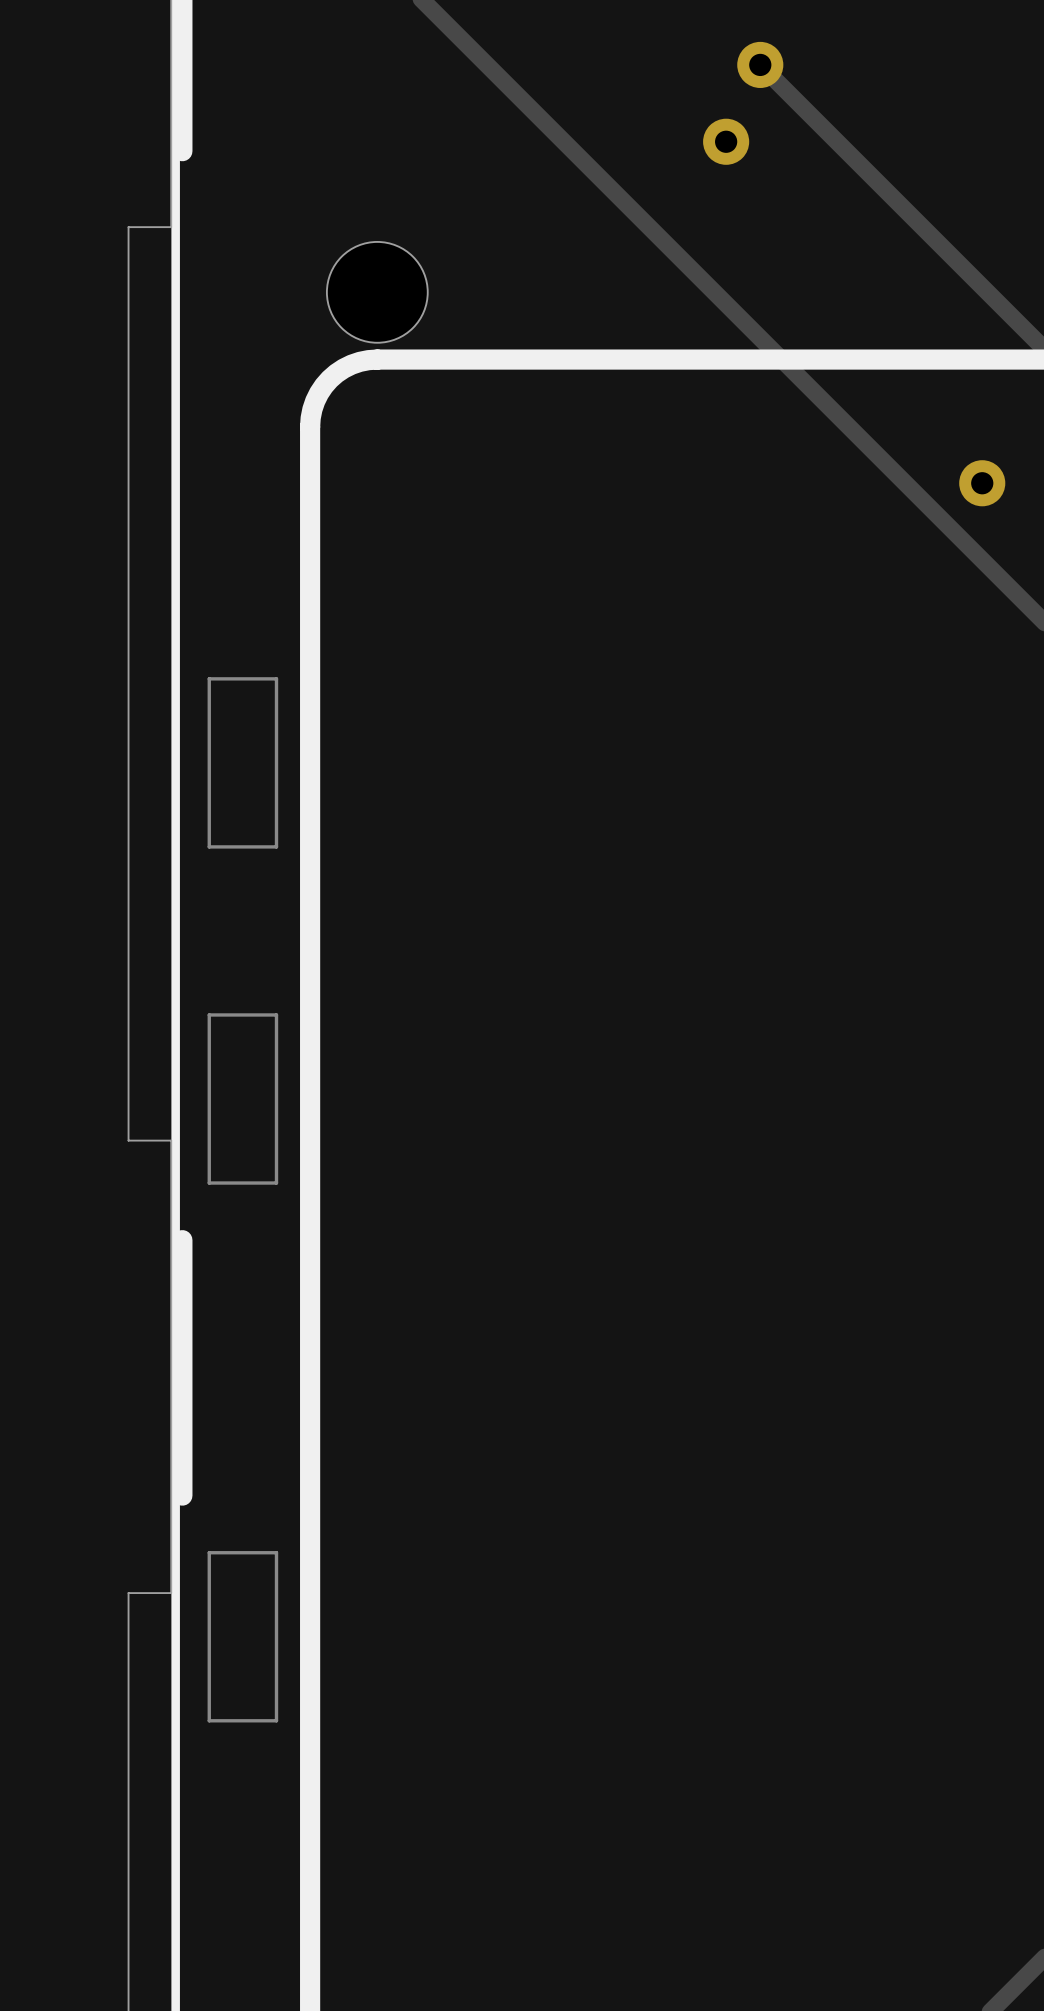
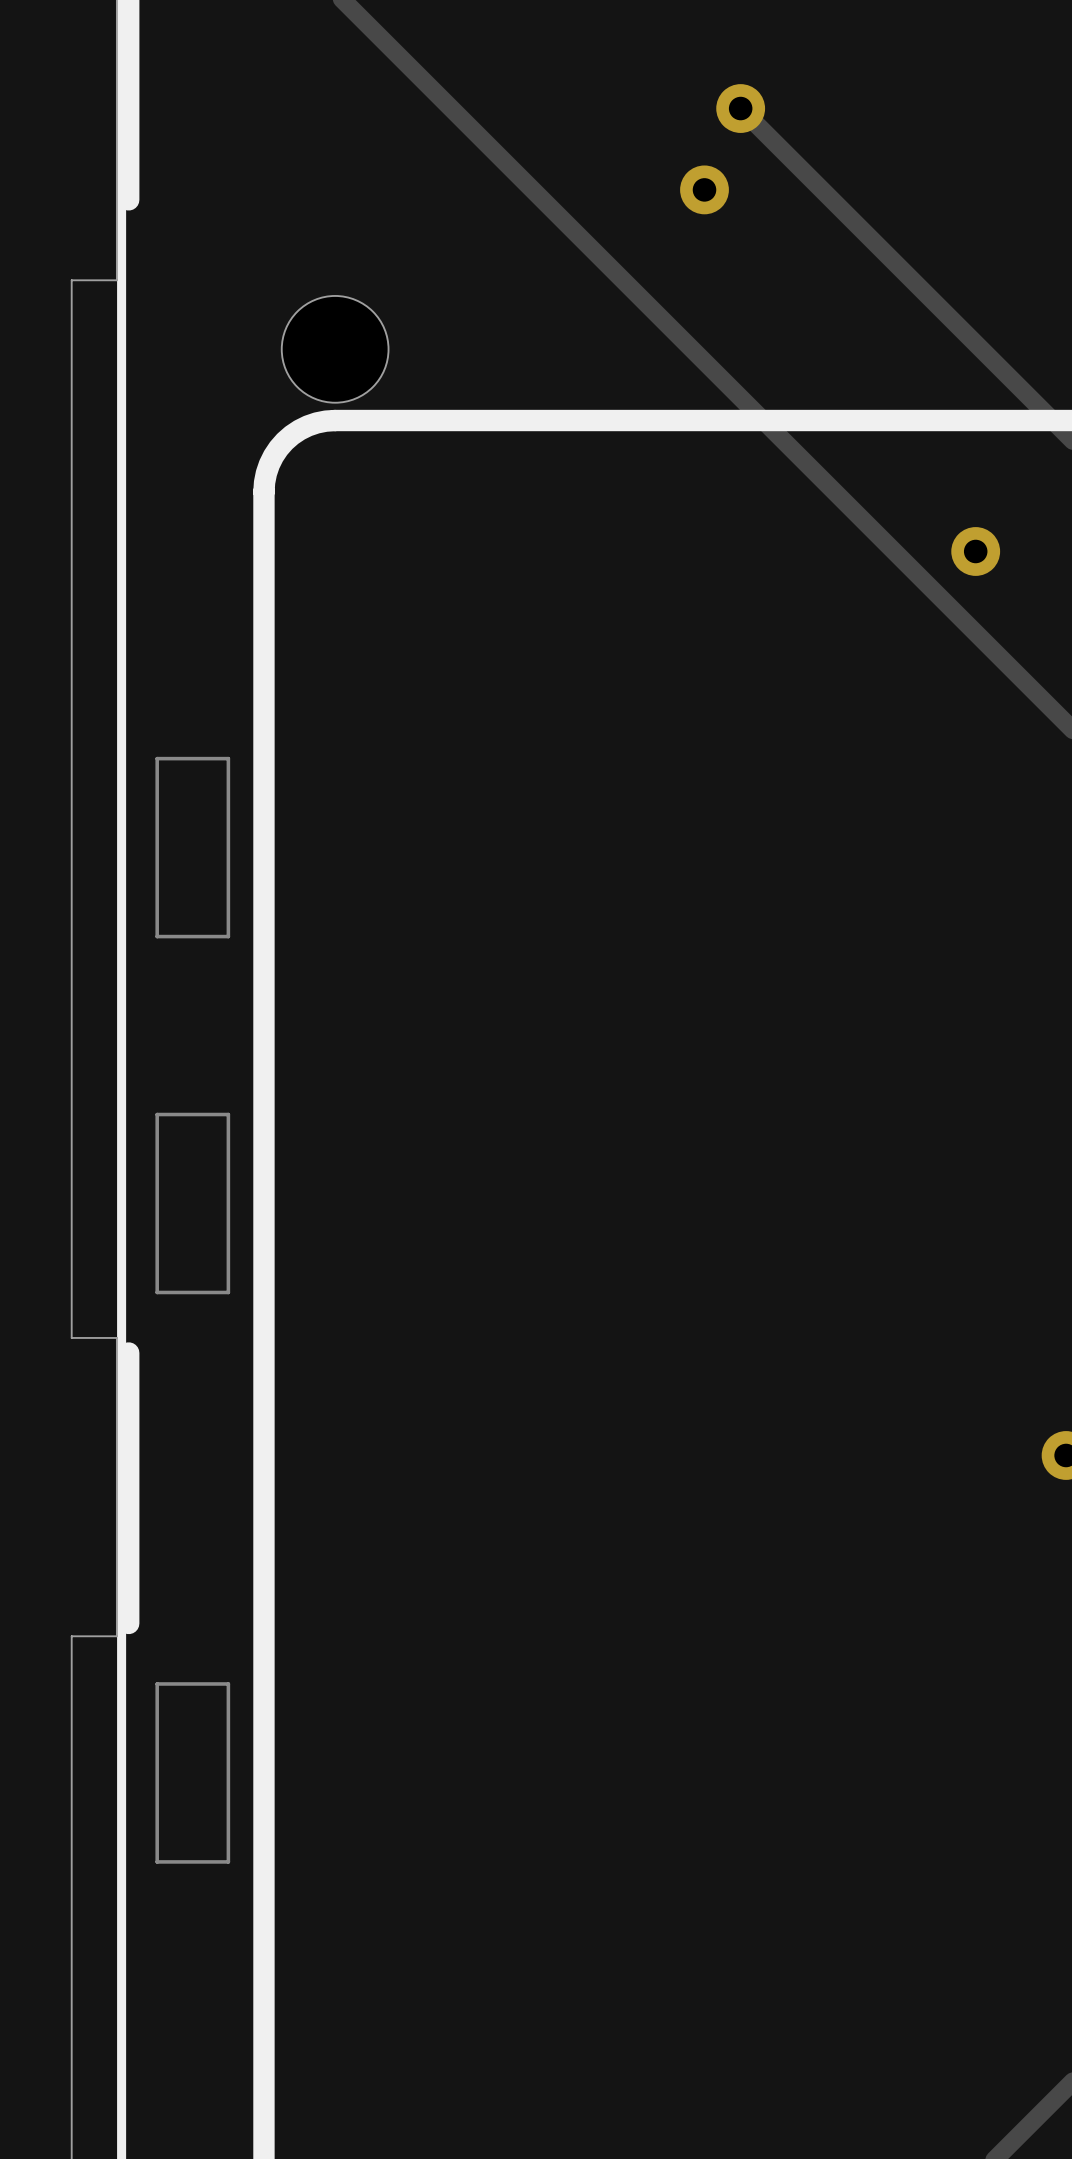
board edge: (128, 1140) (171, 1140) (171, 1225) -> (71, 1247) (71, 1337) (116, 1337)
board edge: (171, 1507) (171, 1593) (128, 1593) -> (116, 1636) (71, 1636) (71, 1726)

